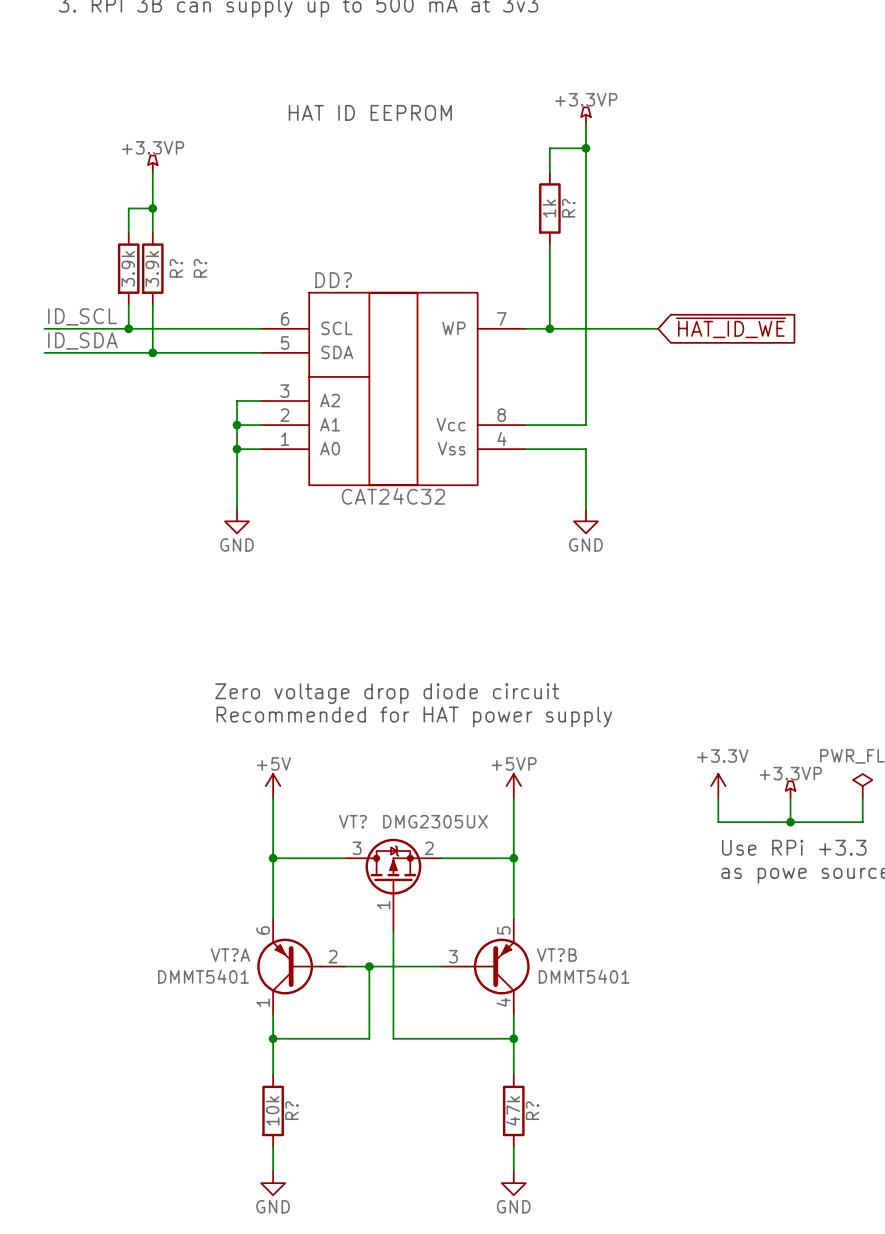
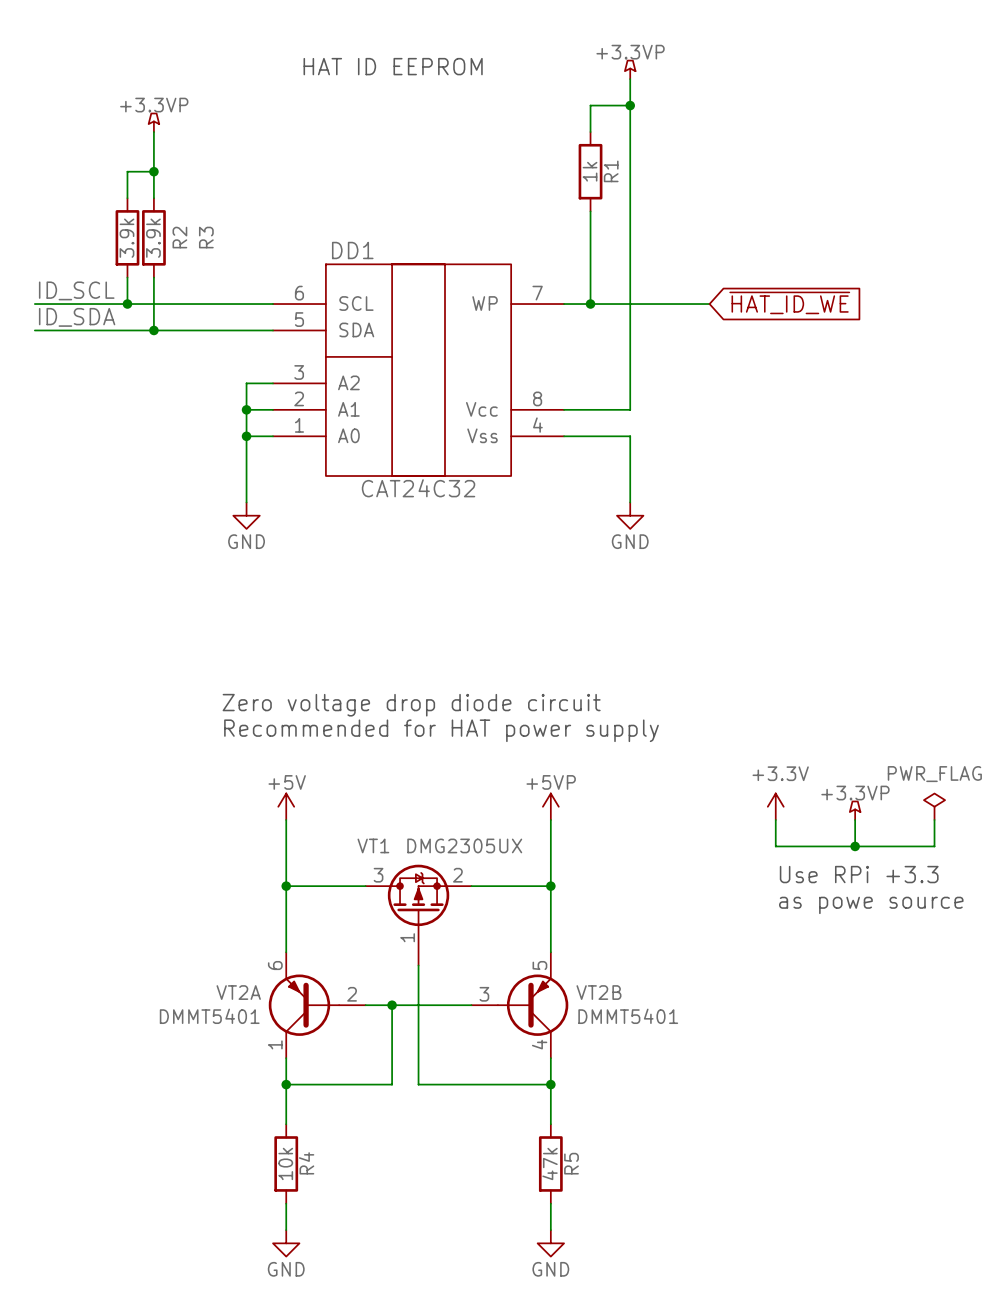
R? name: R? (568, 208) -> R1 (611, 171)
R? name: R? (176, 268) -> R2 (179, 237)
R? name: R? (200, 268) -> R3 (206, 237)
DD? name: DD? (333, 280) -> DD1 (352, 250)
VT? name: VT? (352, 821) -> VT1 (373, 845)
VT?A name: VT?A (230, 955) -> VT2A (238, 992)
VT?B name: VT?B (556, 955) -> VT2B (598, 992)
R? name: R? (291, 1110) -> R4 (306, 1163)
R? name: R? (532, 1110) -> R5 (571, 1163)

